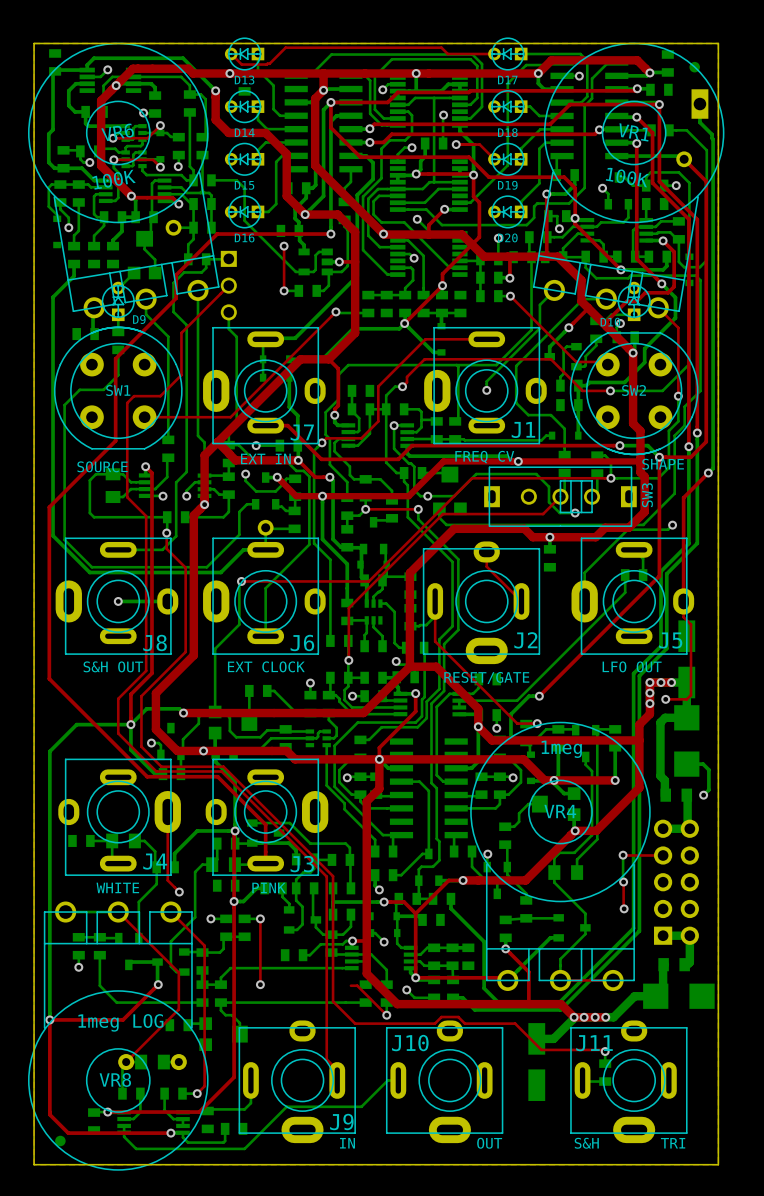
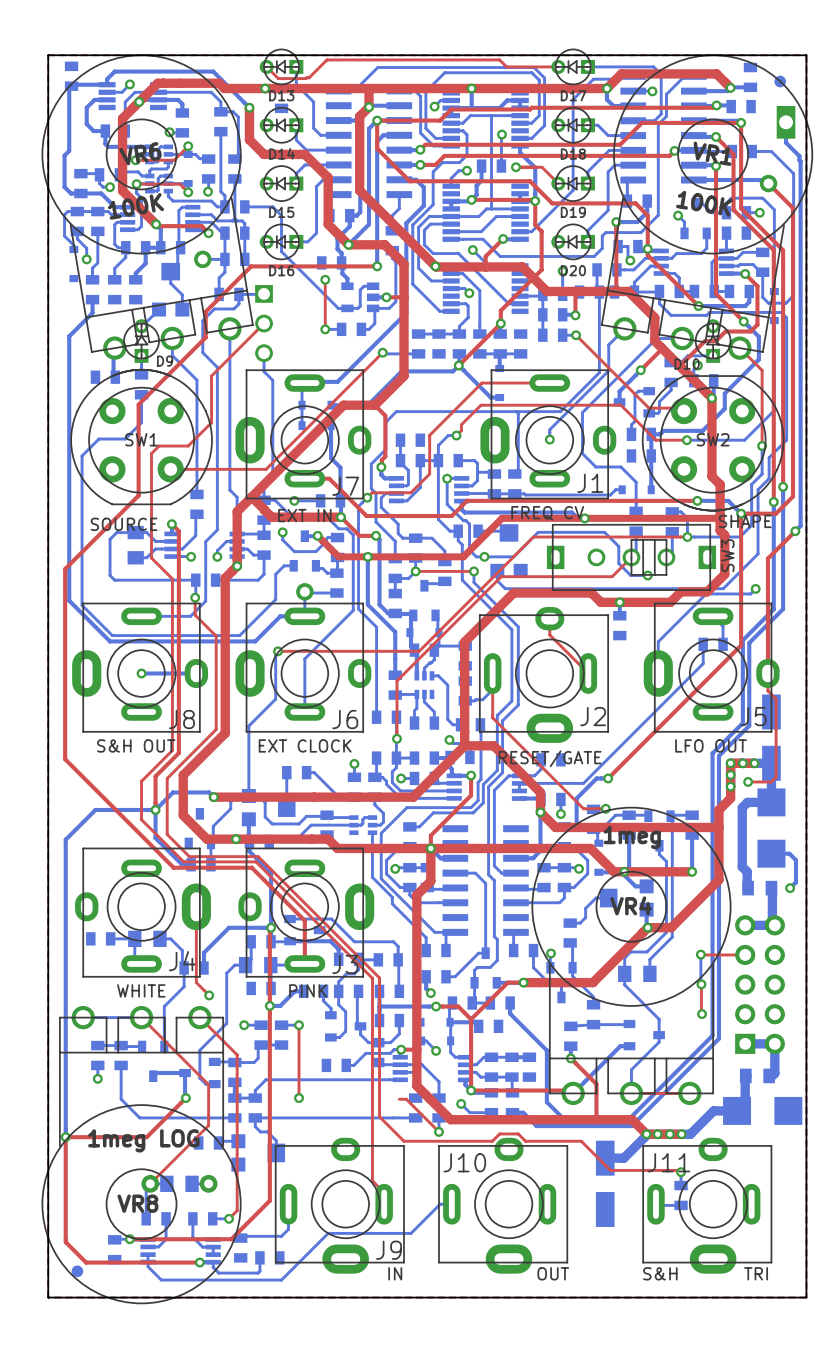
bottom track: (151, 743) (158, 743) (160, 745) (160, 754) -> none
via: (151, 743) -> none

